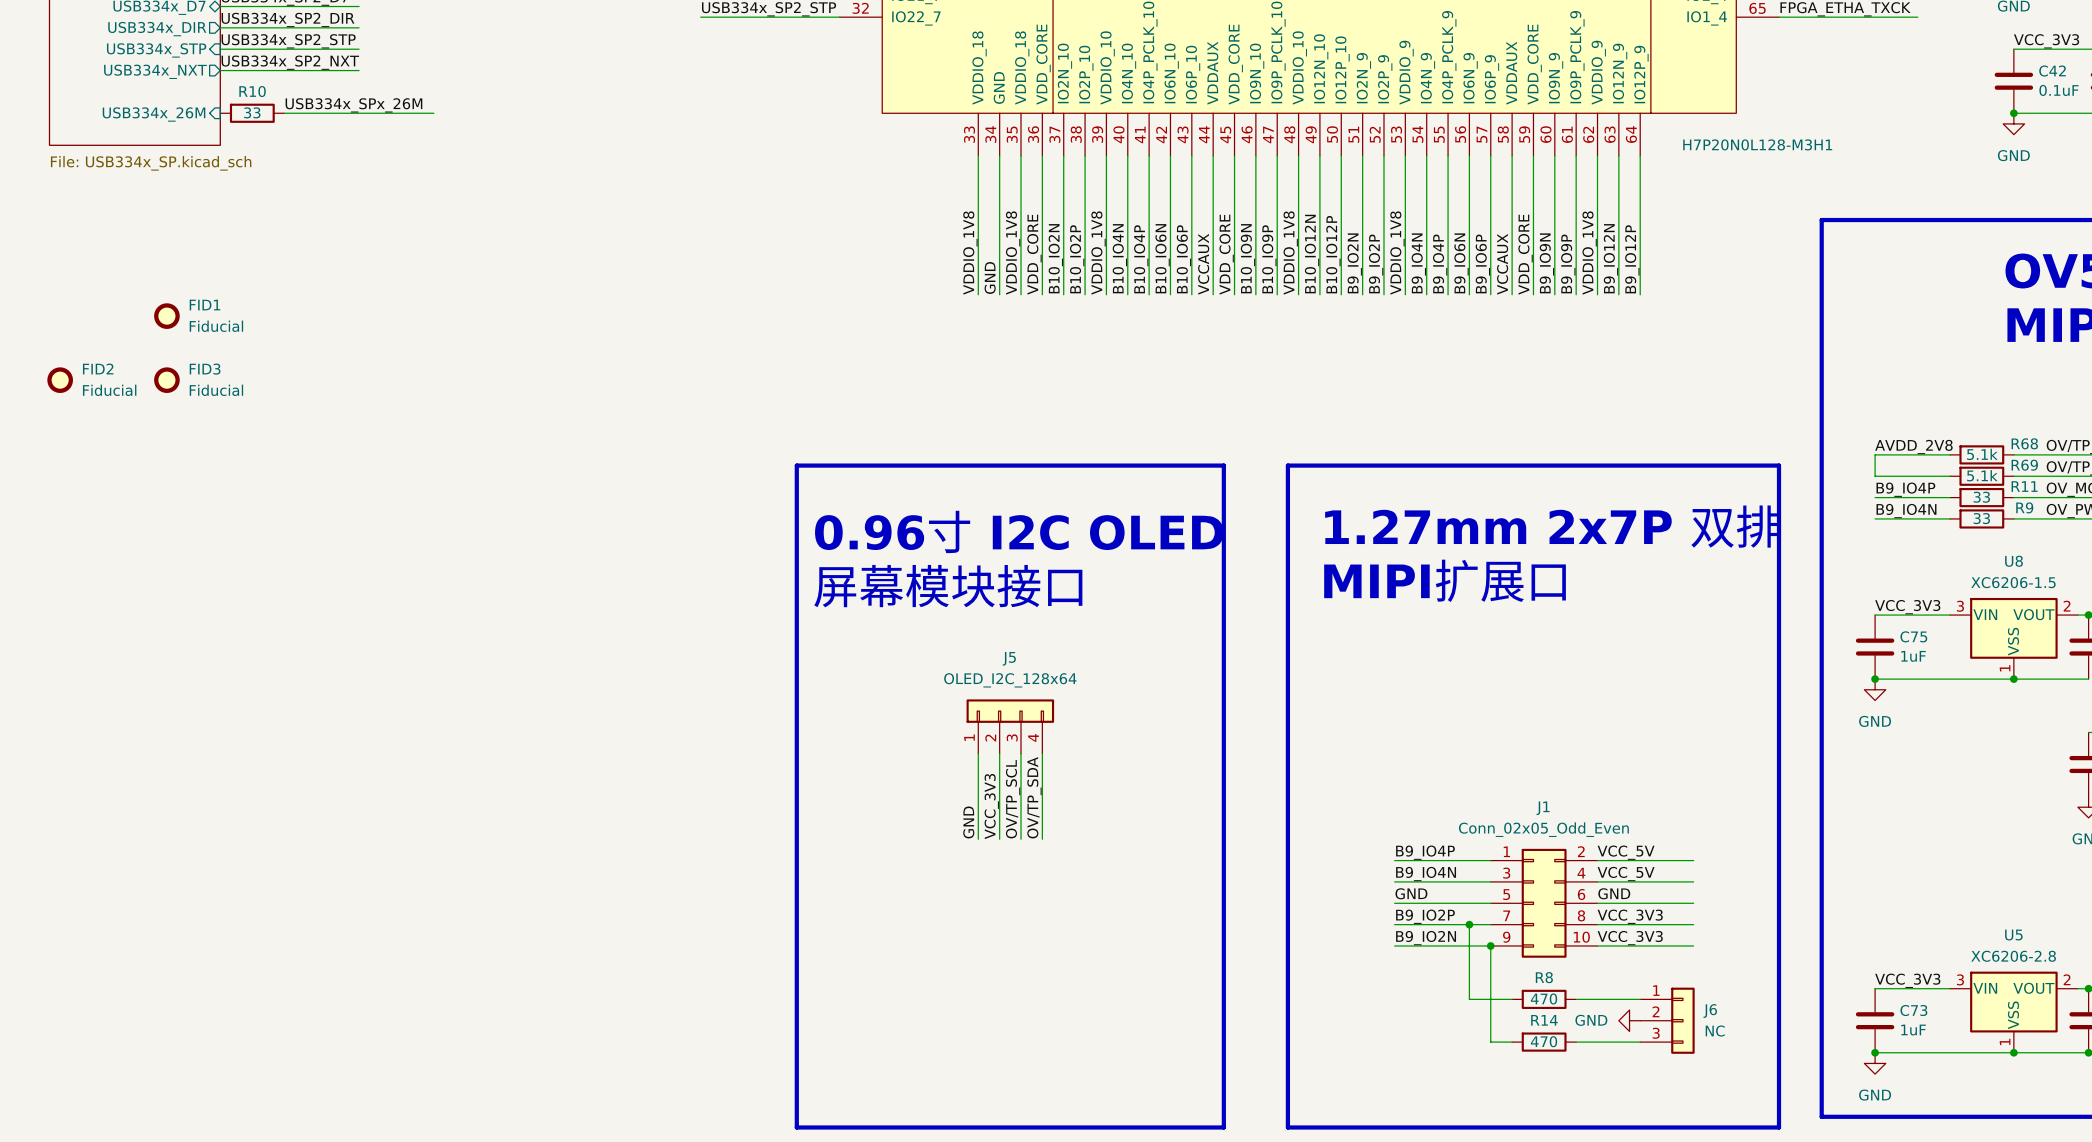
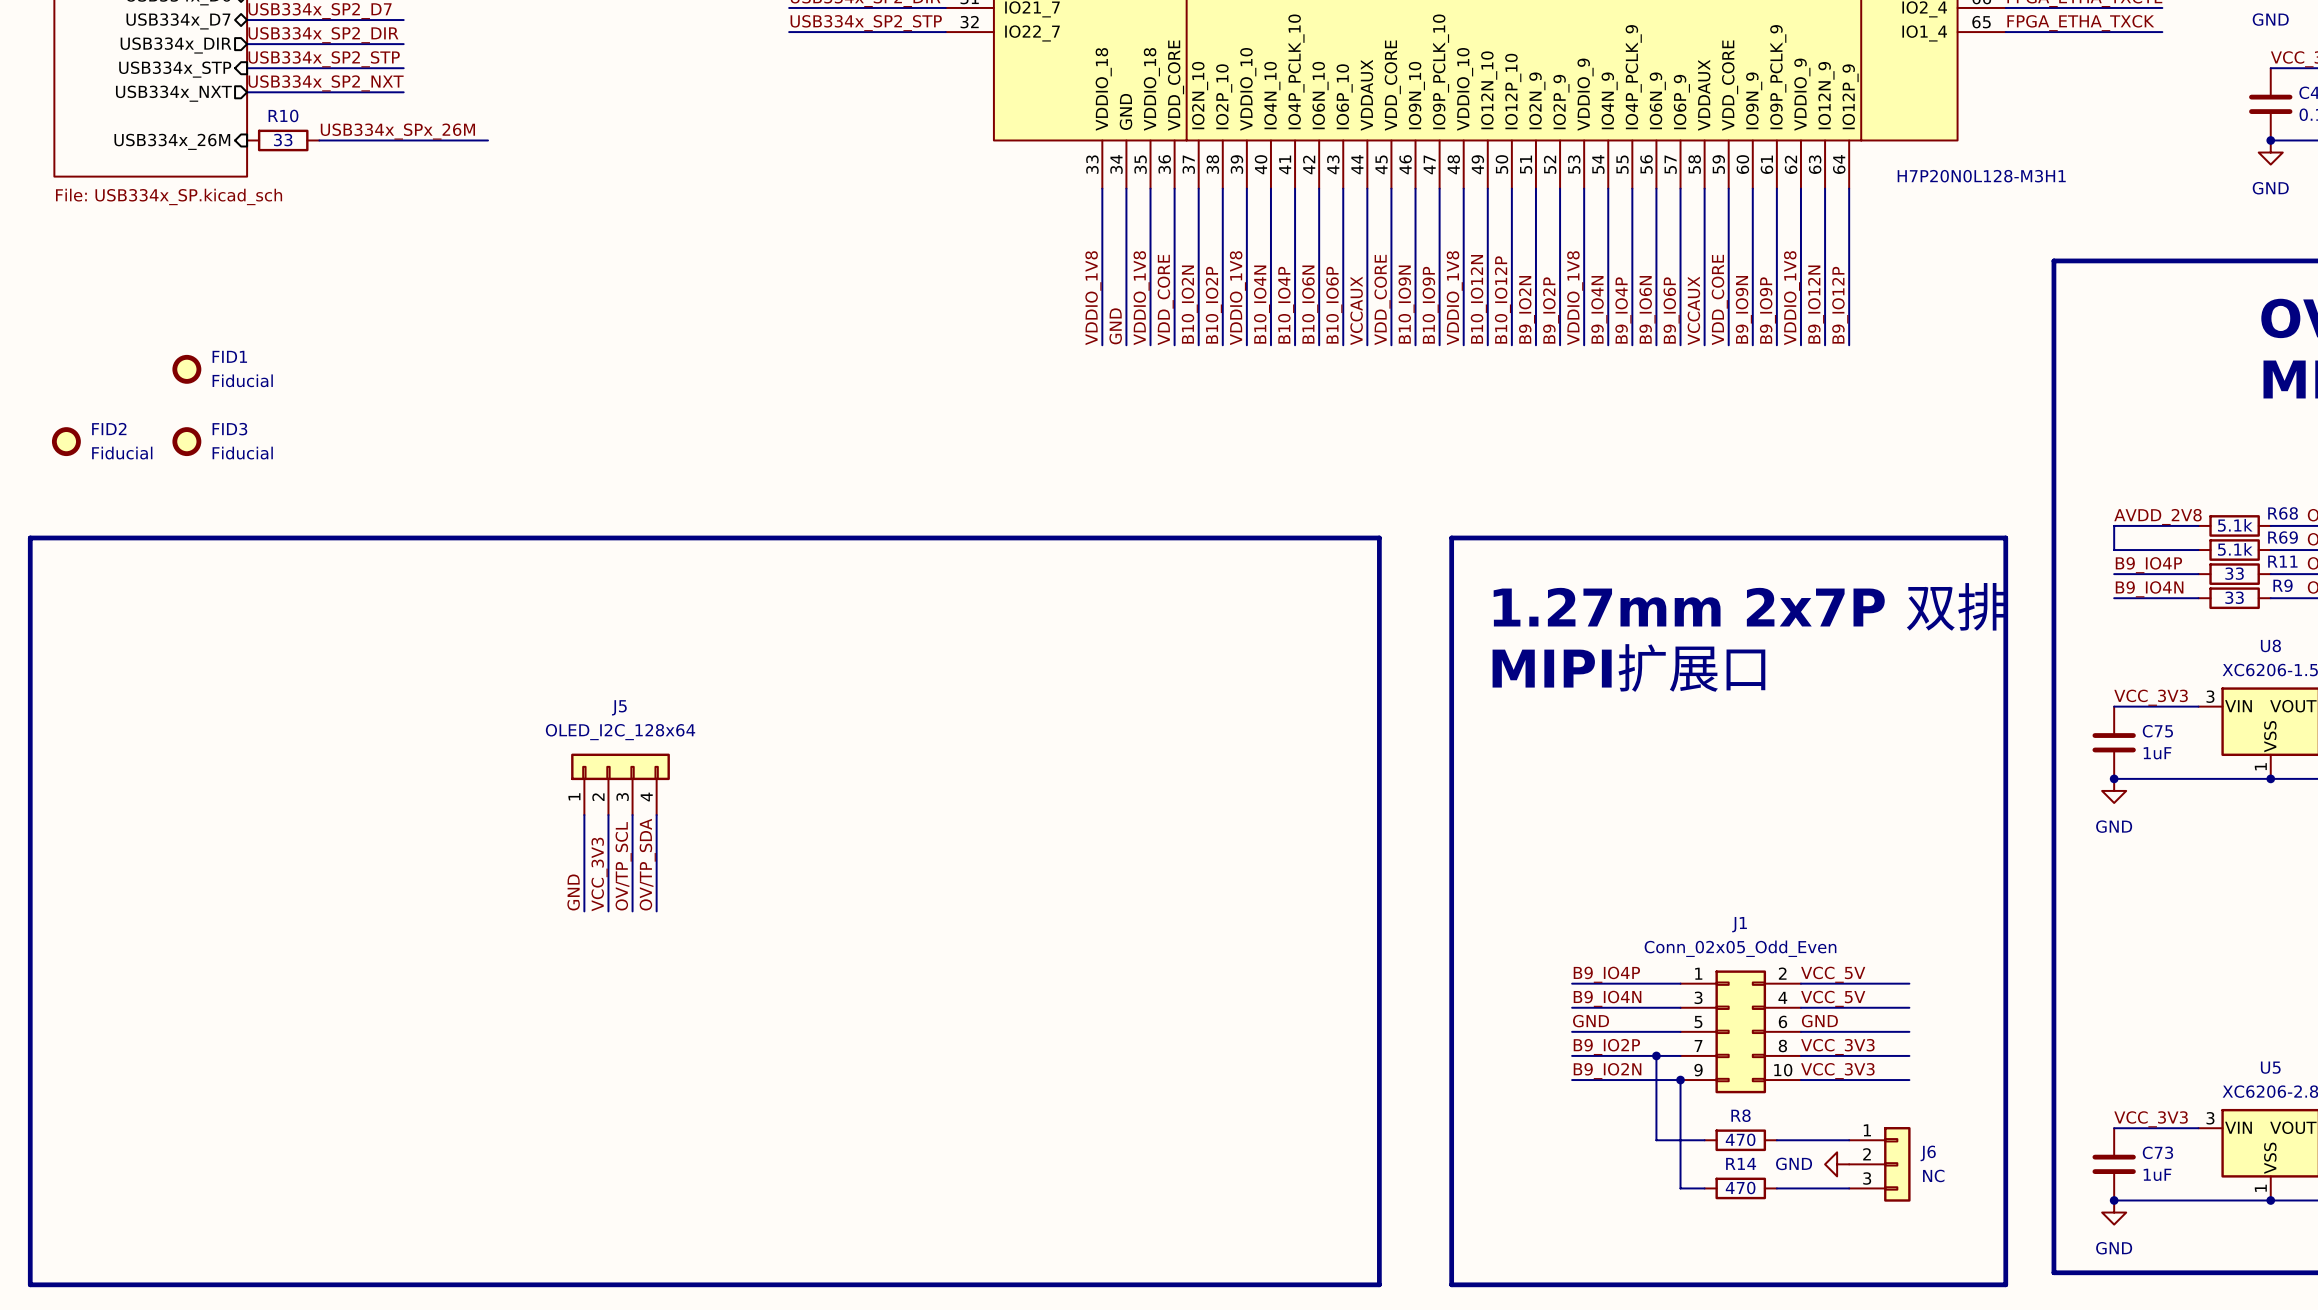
line: (796, 465) (796, 1127) -> (897, 537) (30, 537) (30, 1284) (897, 1284)
text: 0.96寸 I2C OLED (1019, 531) -> none
text: 屏幕模块接口 (948, 586) -> none
wire: none -> (584, 815) (584, 911)
wire: none -> (608, 815) (608, 911)
wire: none -> (632, 815) (632, 911)
wire: none -> (656, 815) (656, 911)
J5 position: (1010, 726) -> (620, 784)
wire: (978, 753) (978, 839) -> none
wire: (999, 753) (999, 839) -> none
wire: (1021, 753) (1021, 839) -> none
wire: (1042, 753) (1042, 839) -> none
label: none -> OV/TP_SDA (647, 864)
label: none -> OV/TP_SCL (623, 866)
label: none -> VCC_3V3 (599, 874)
label: none -> GND (573, 892)
label: OV/TP_SDA (1034, 797) -> none
label: OV/TP_SCL (1013, 799) -> none
label: VCC_3V3 (991, 806) -> none
label: GND (968, 822) -> none

